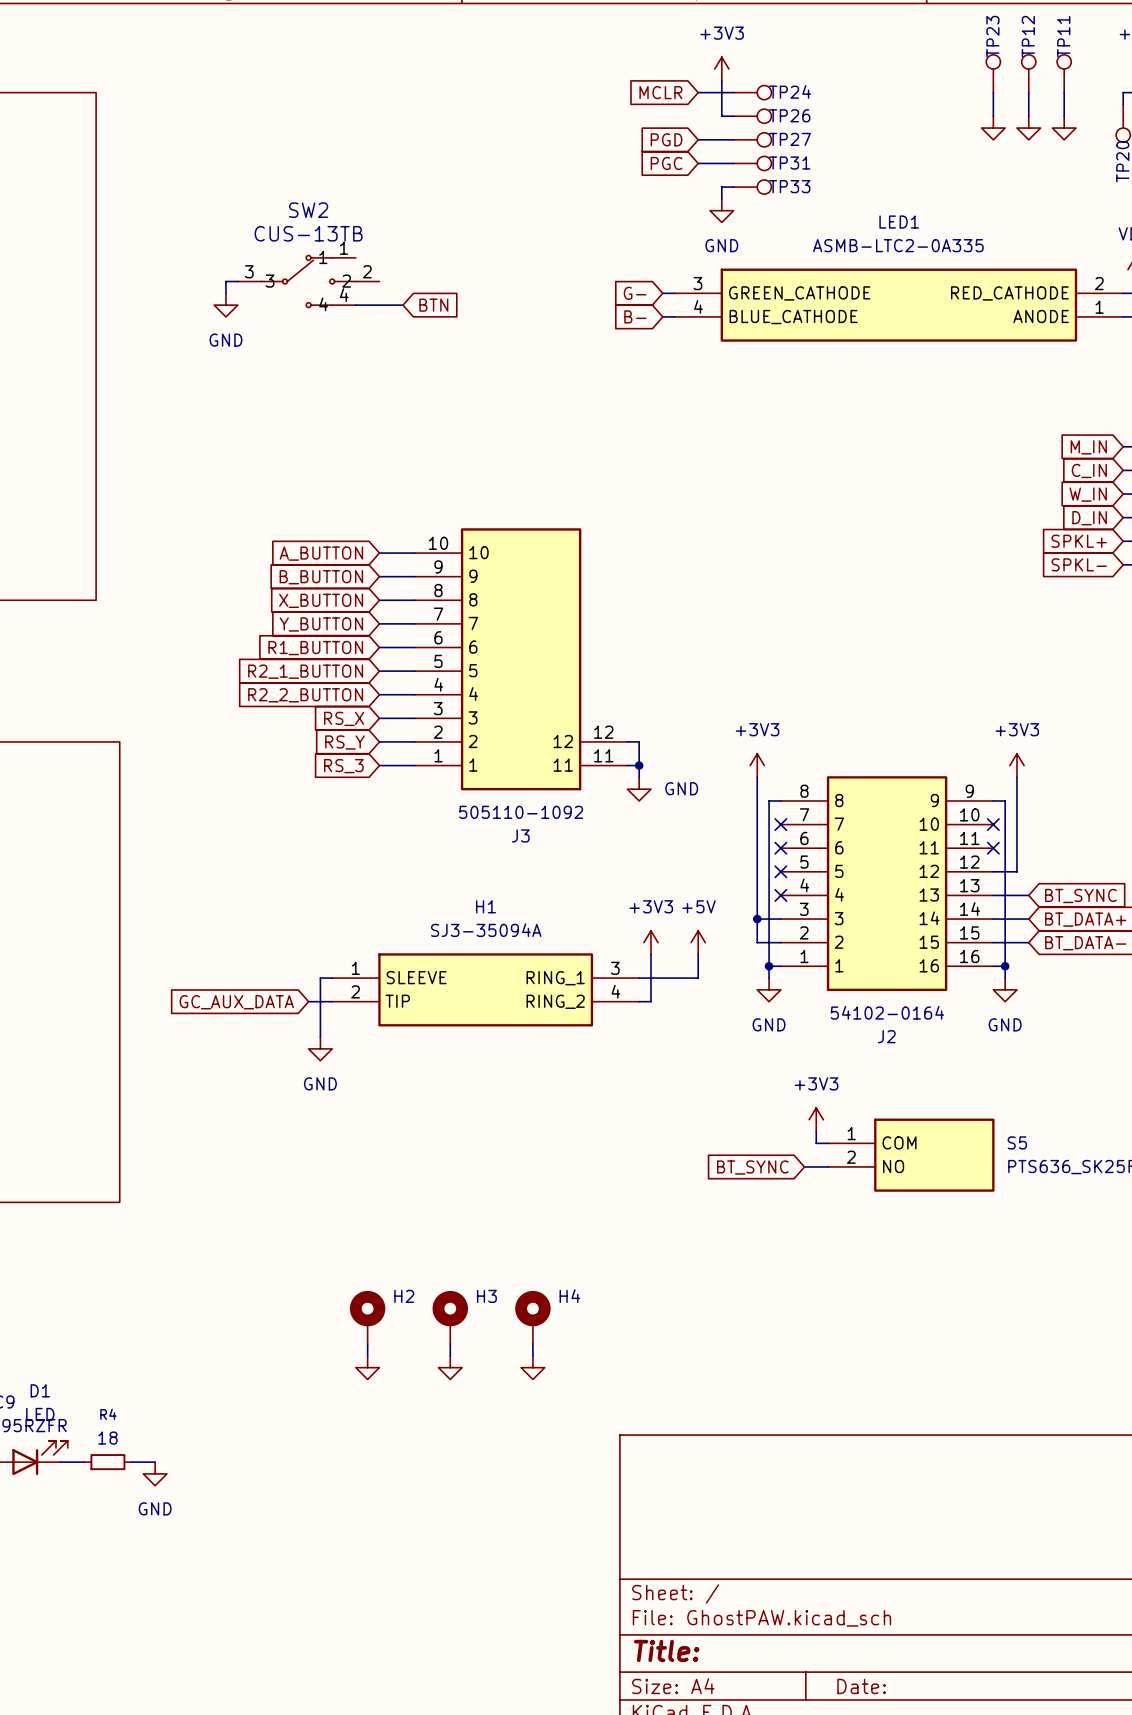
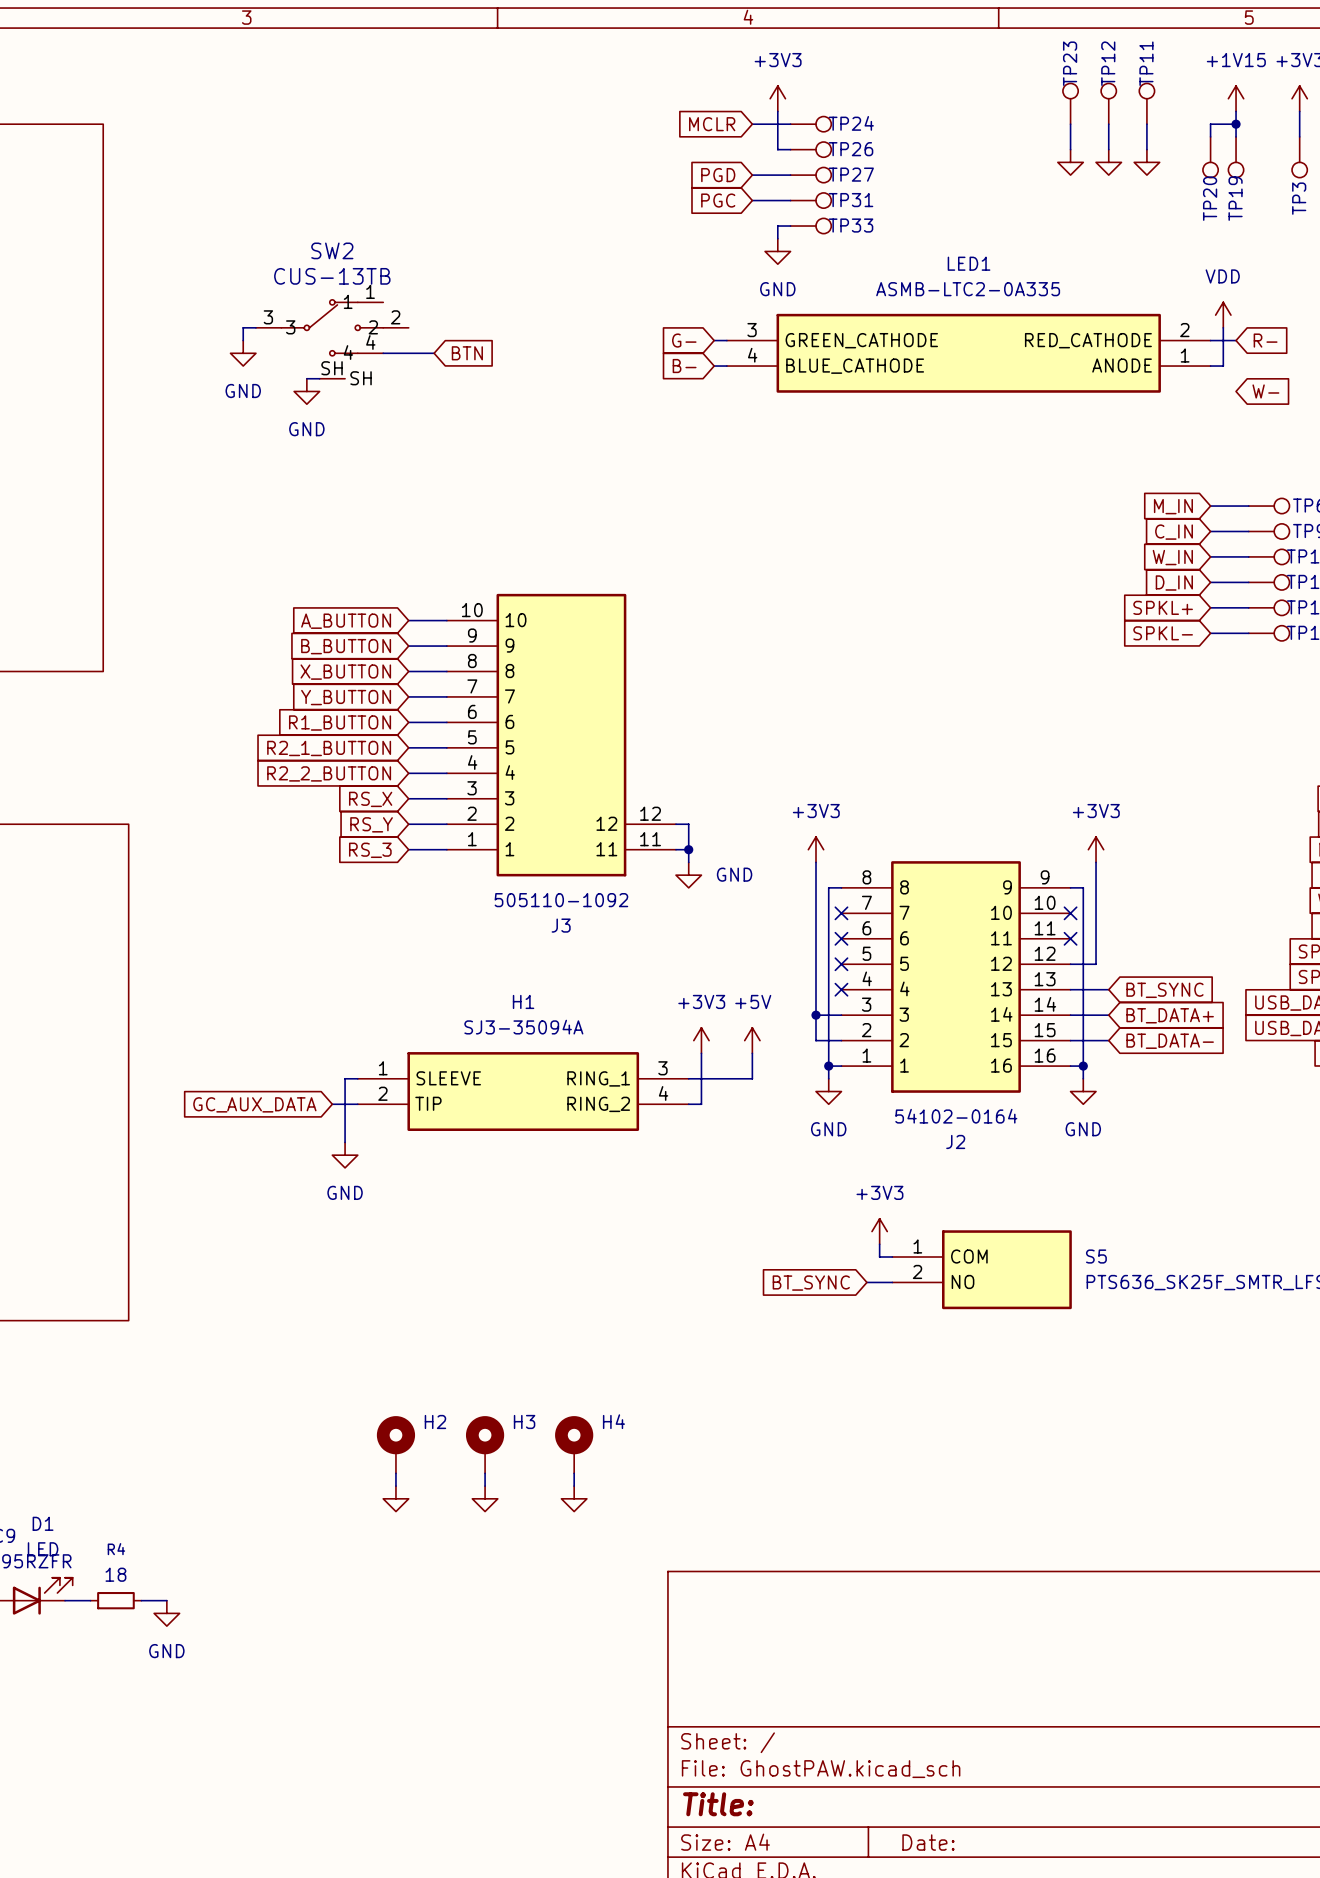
SW2 symbol: [237, 254, 380, 309] -> [255, 299, 409, 379]
wire: none -> (306, 378) (319, 378)
power symbol: none -> GND (306, 391)

